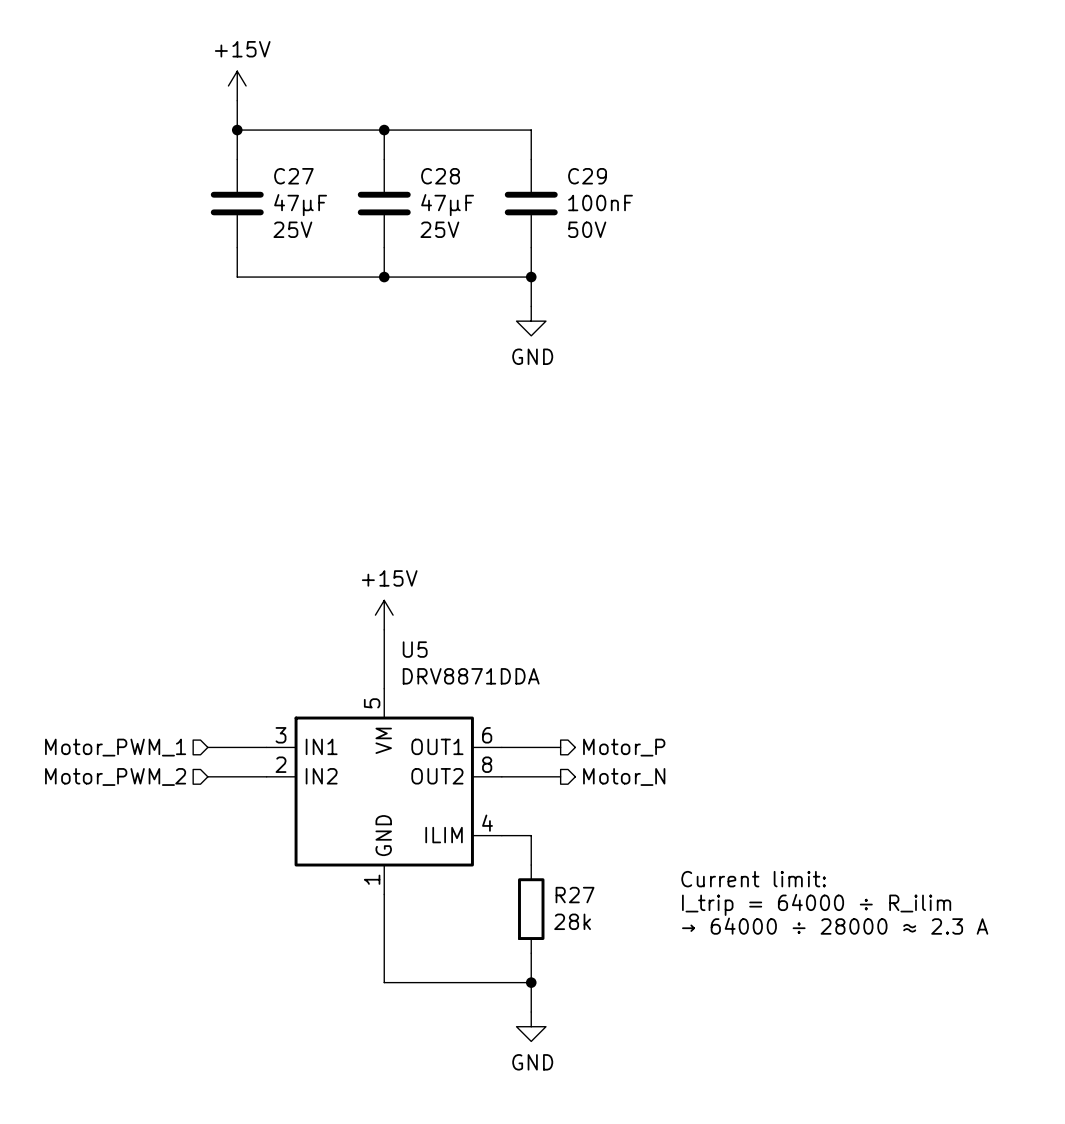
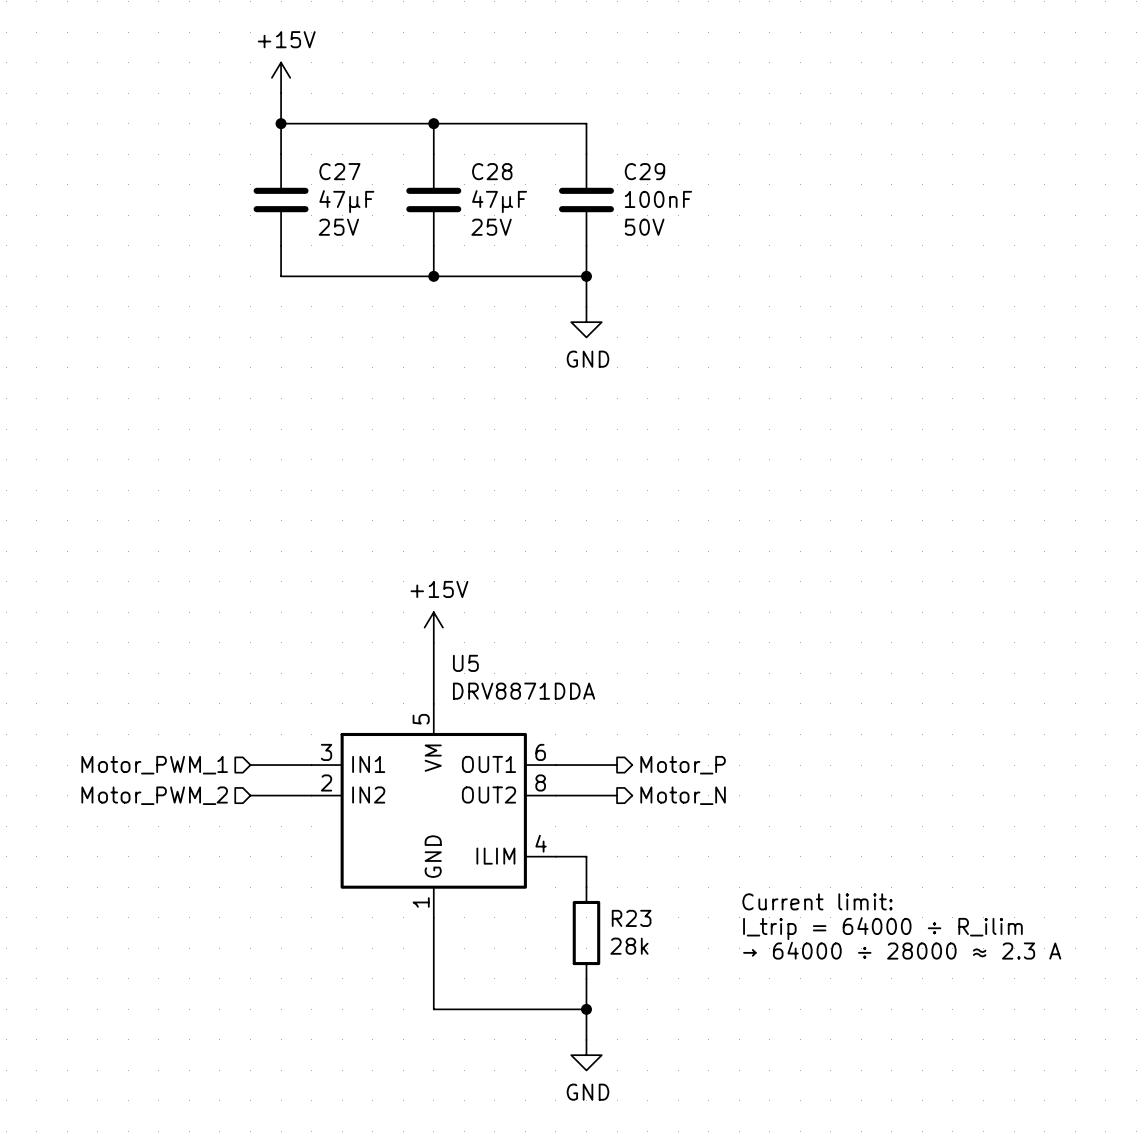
R27 name: R27 (575, 895) -> R23 (631, 918)

